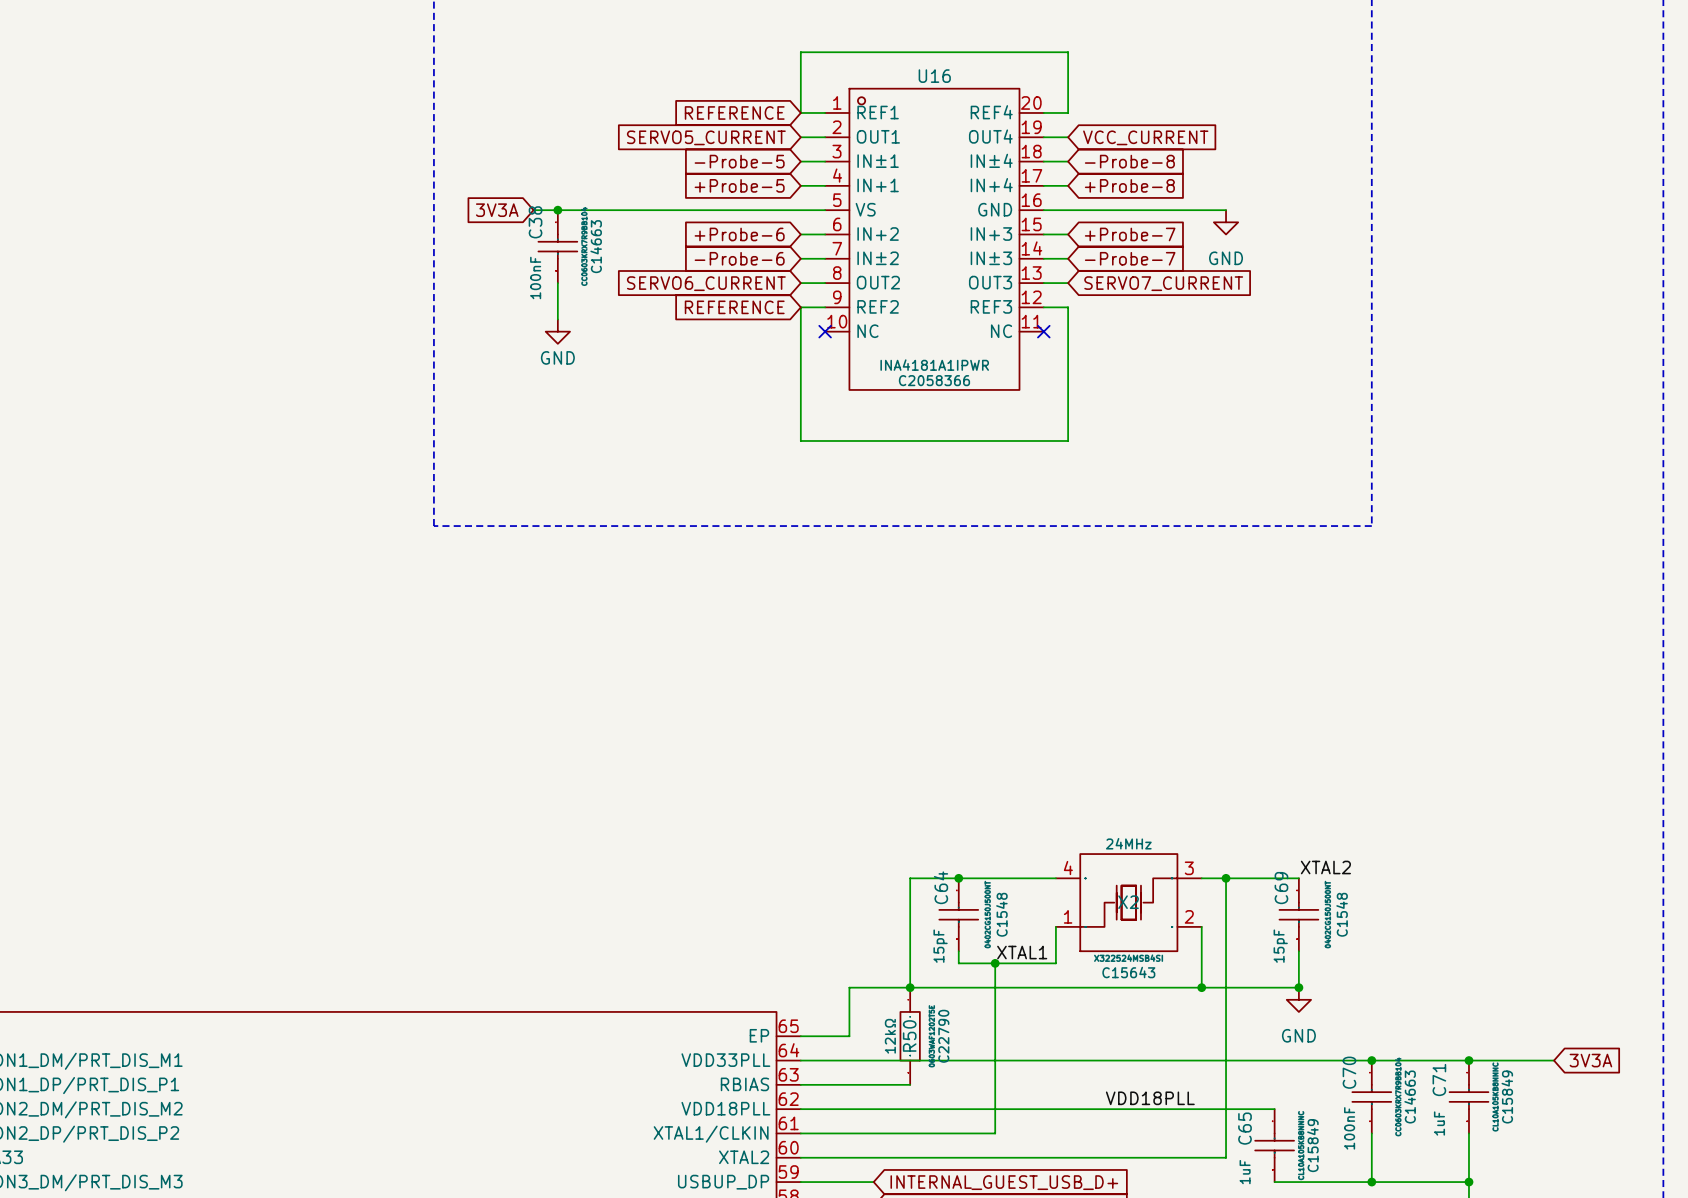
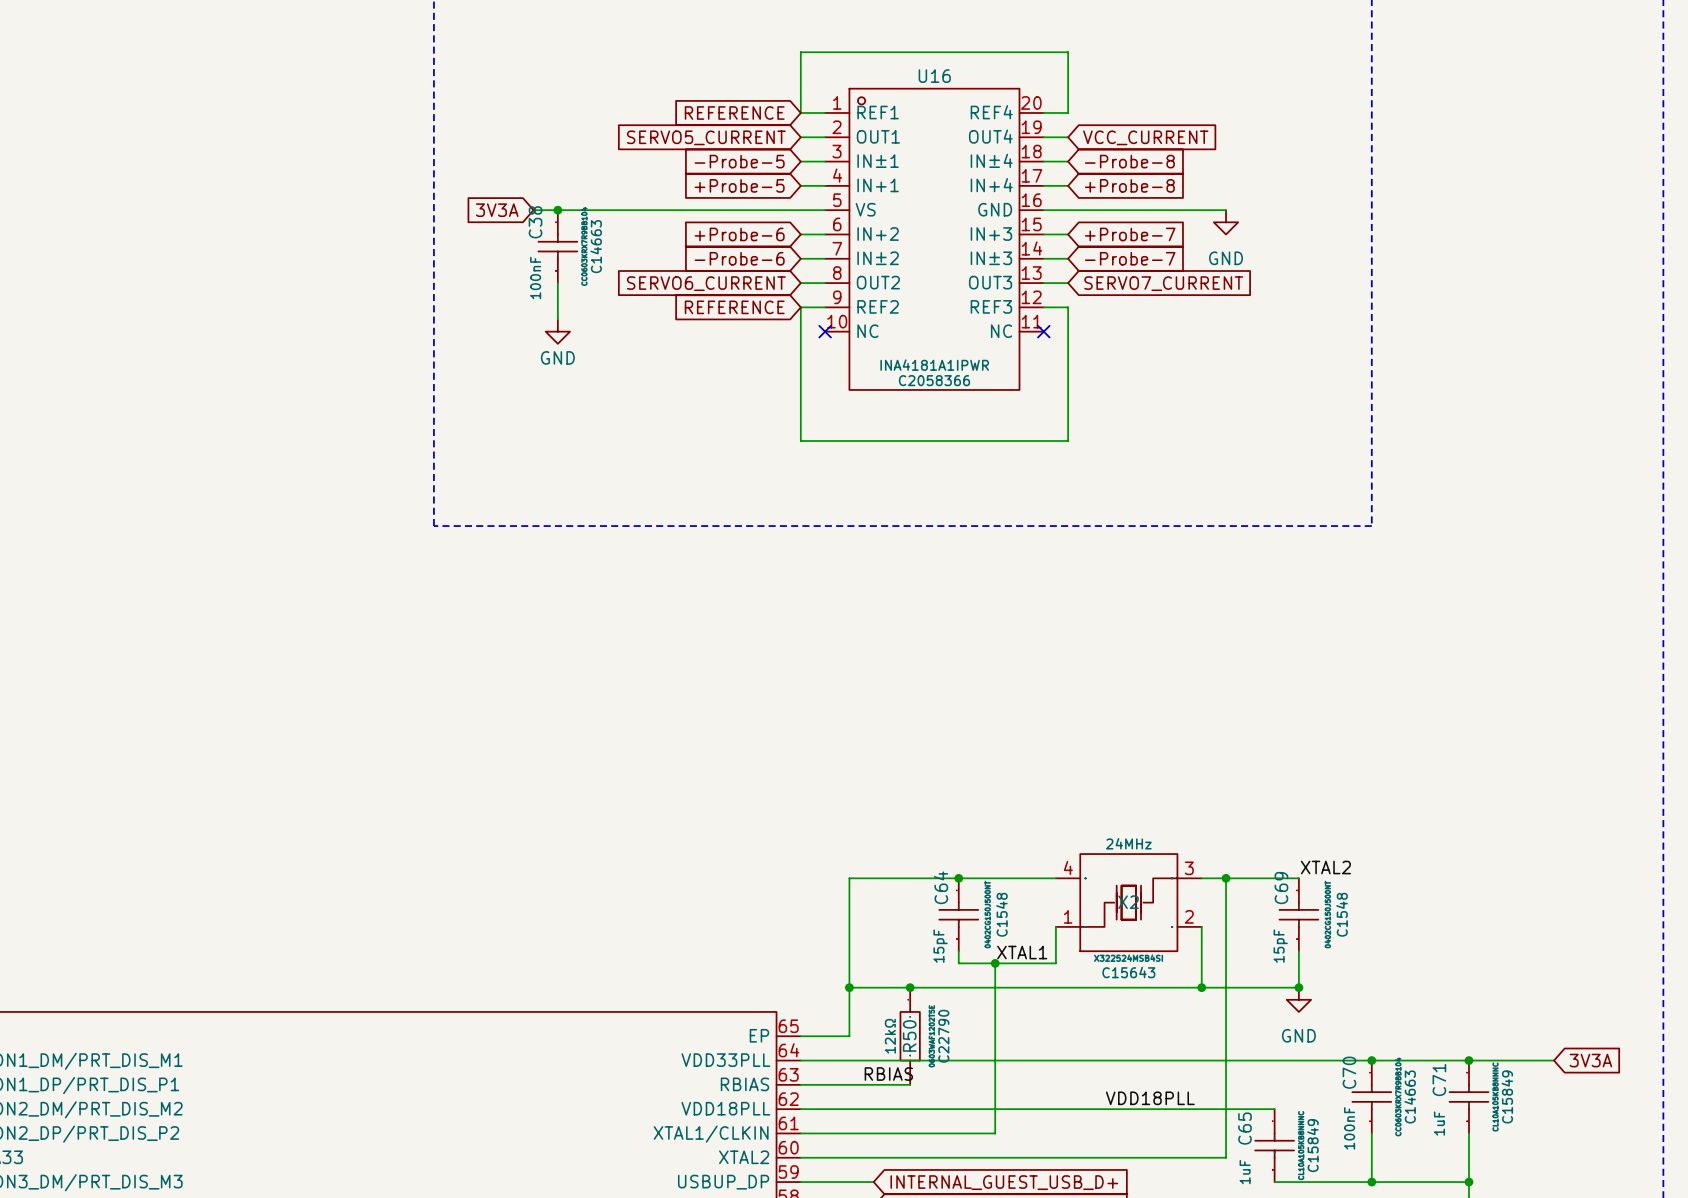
wire: (910, 878) (910, 987) -> (910, 878) (849, 878) (849, 987)
junction: none -> (849, 987)
label: none -> RBIAS (888, 1074)

